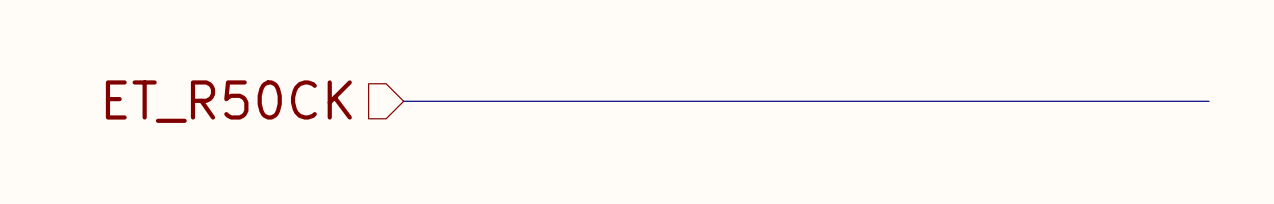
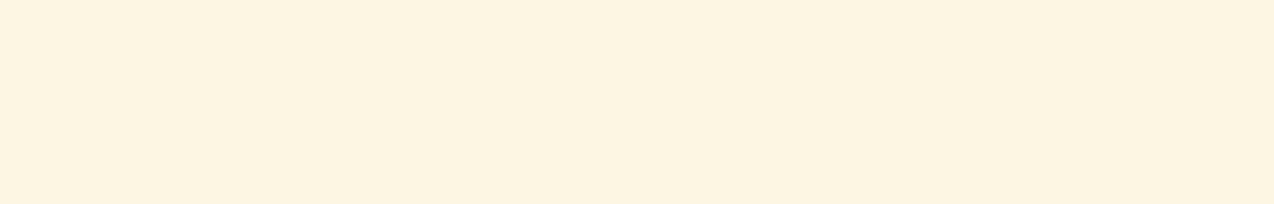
hierarchical label: ET_R50CK (228, 101) -> none
wire: (403, 101) (1209, 101) -> none

